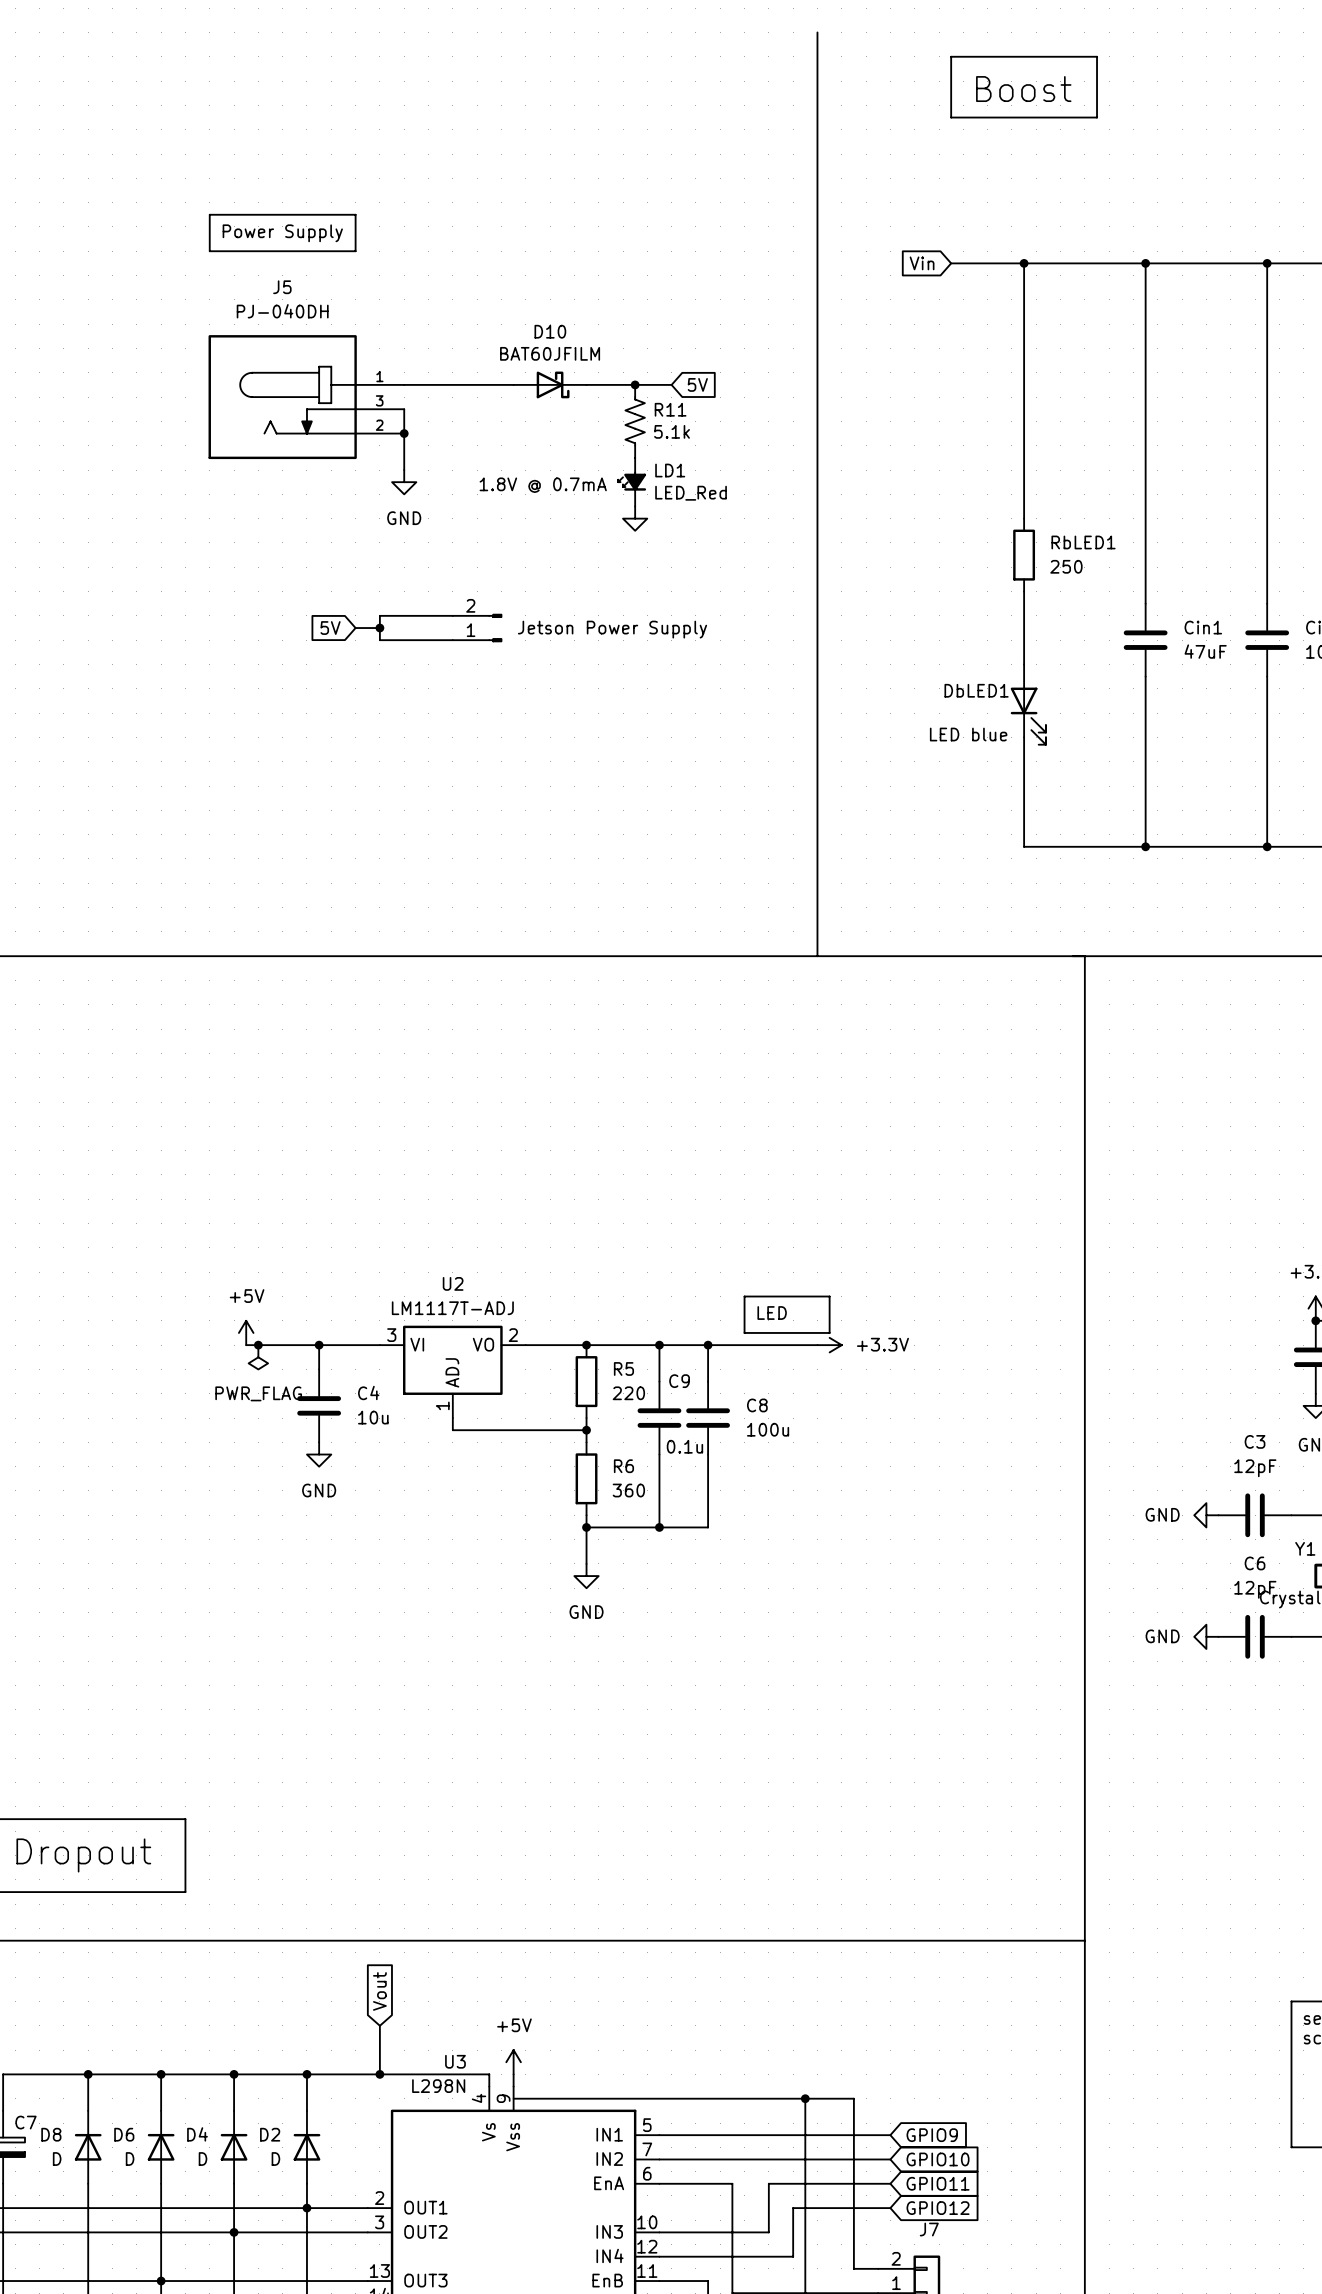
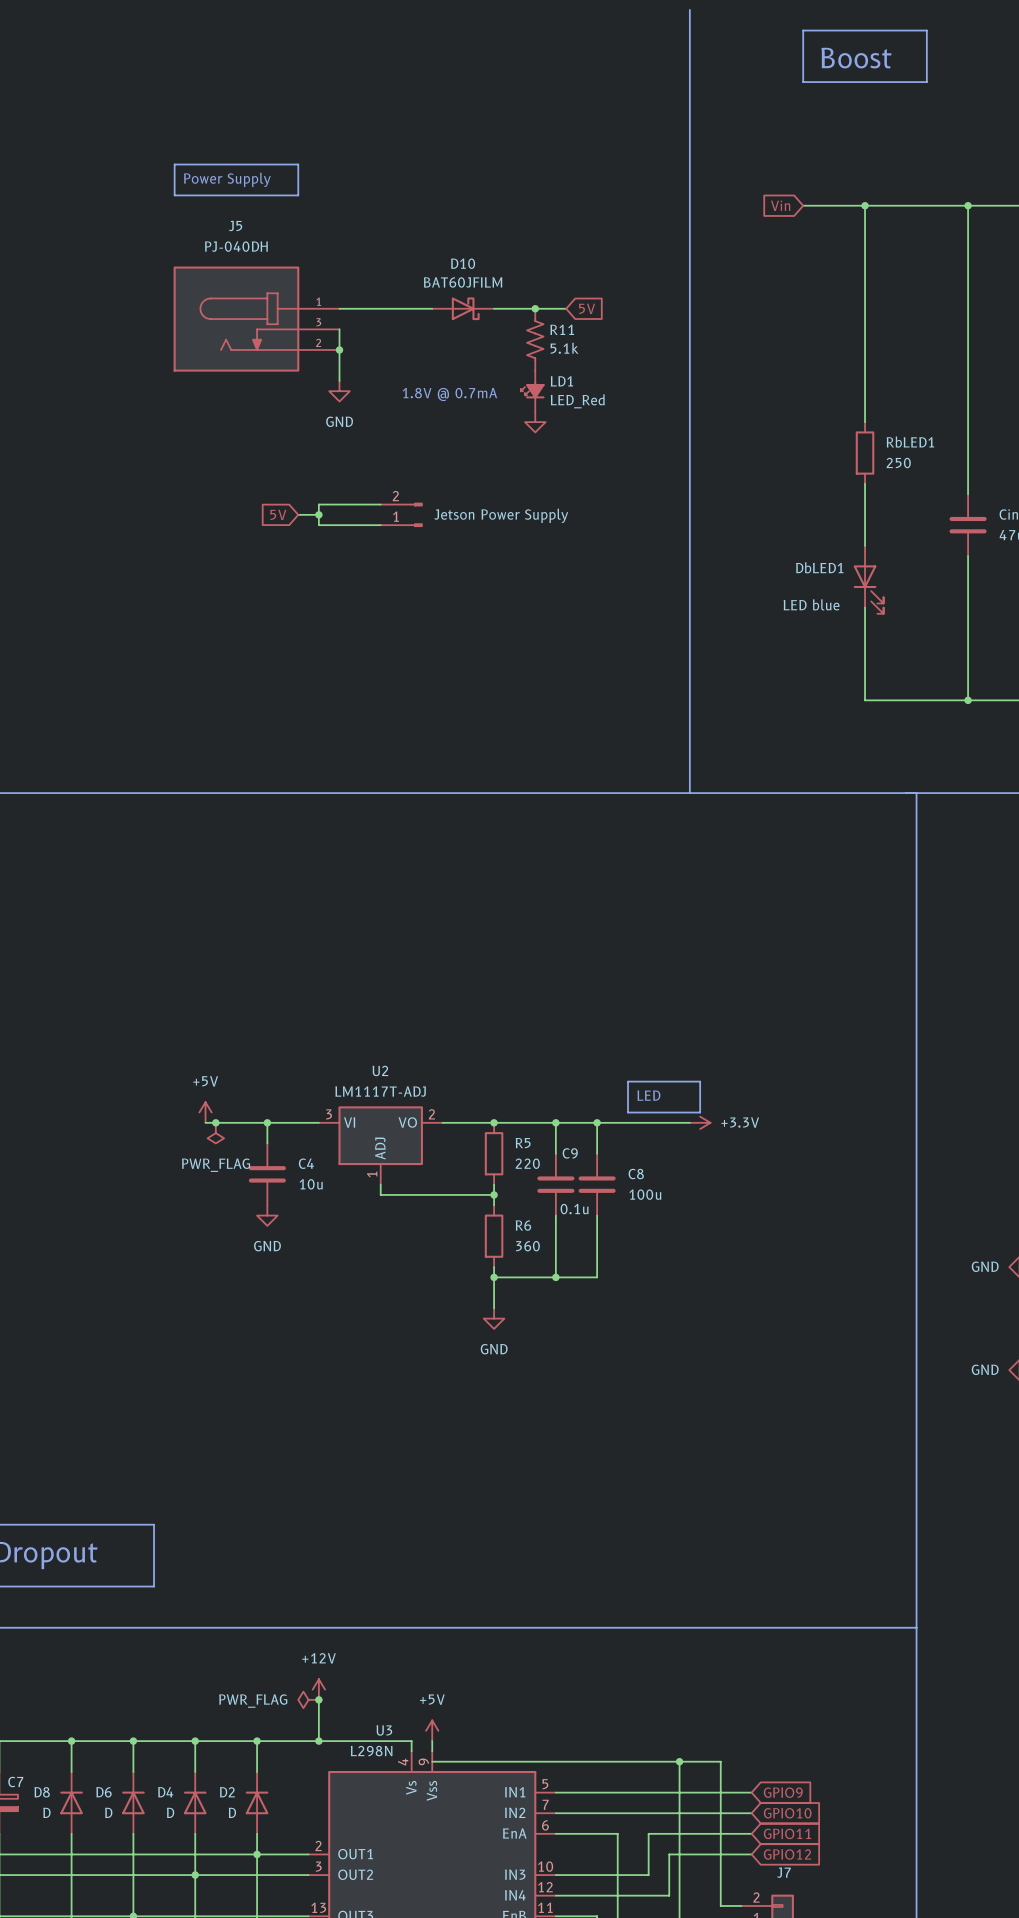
global label: Vout (379, 1991) -> none
power symbol: none -> +12V (318, 1689)
power symbol: none -> PWR_FLAG (308, 1699)
junction: none -> (318, 1699)

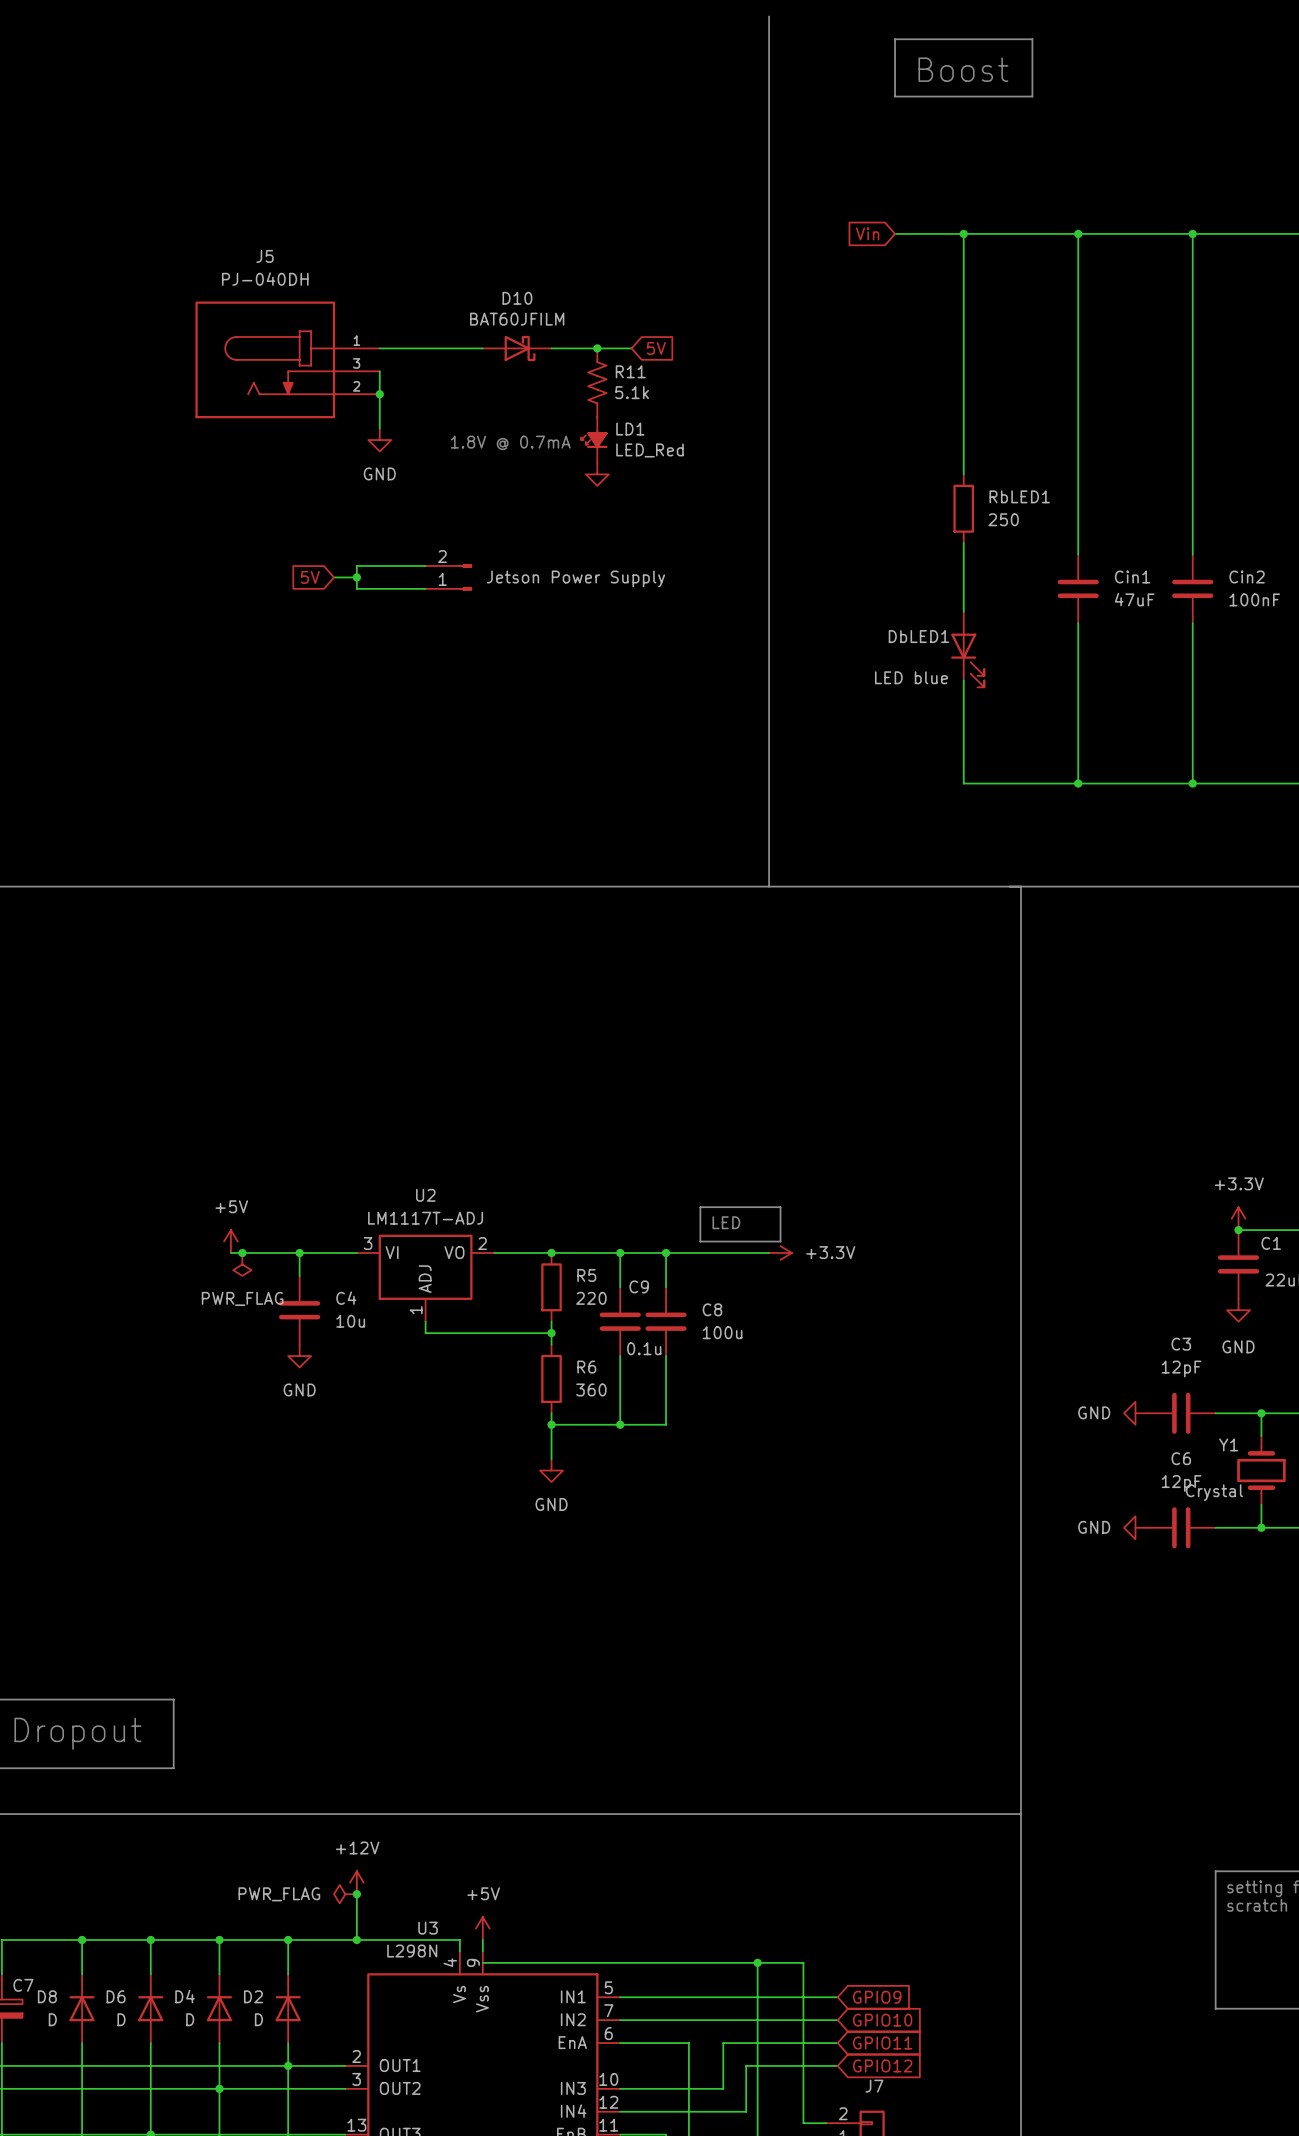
line: (174, 164) (298, 164) (298, 195) (174, 195) (174, 164) -> none
text: Power Supply (227, 179) -> none

